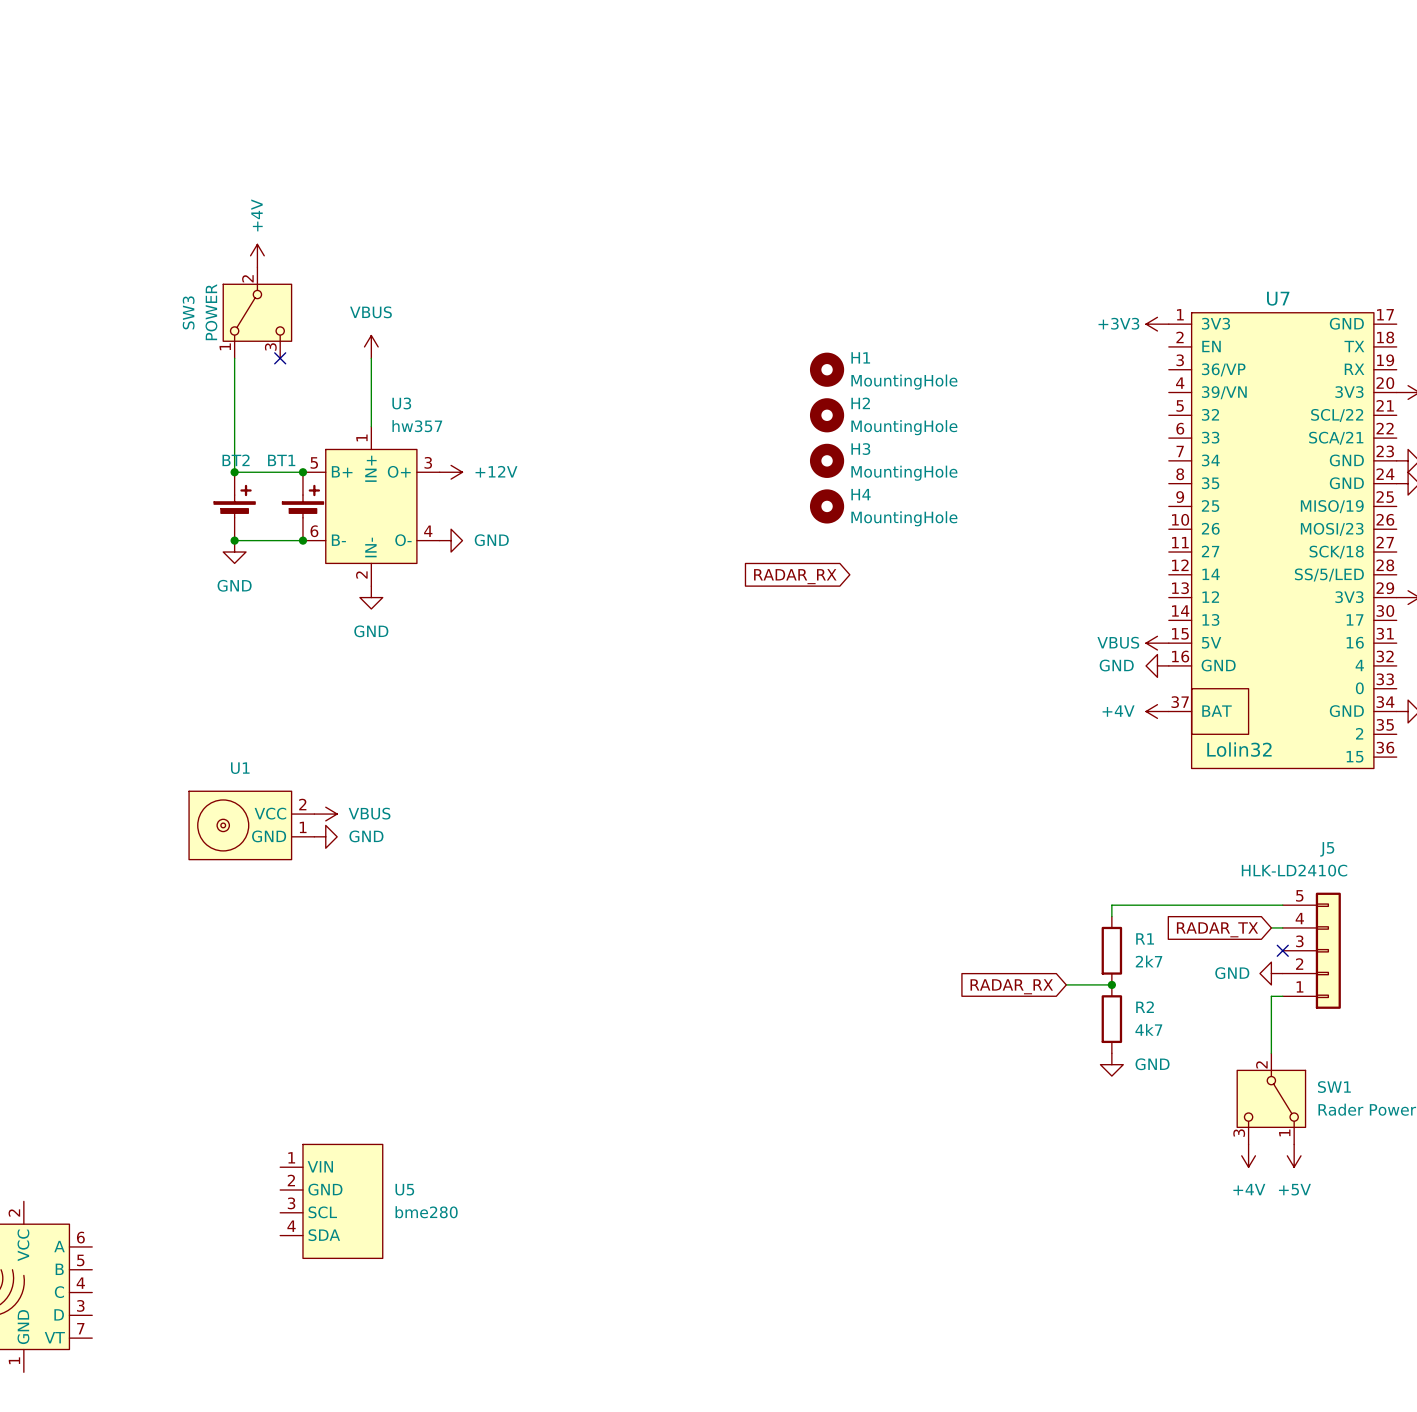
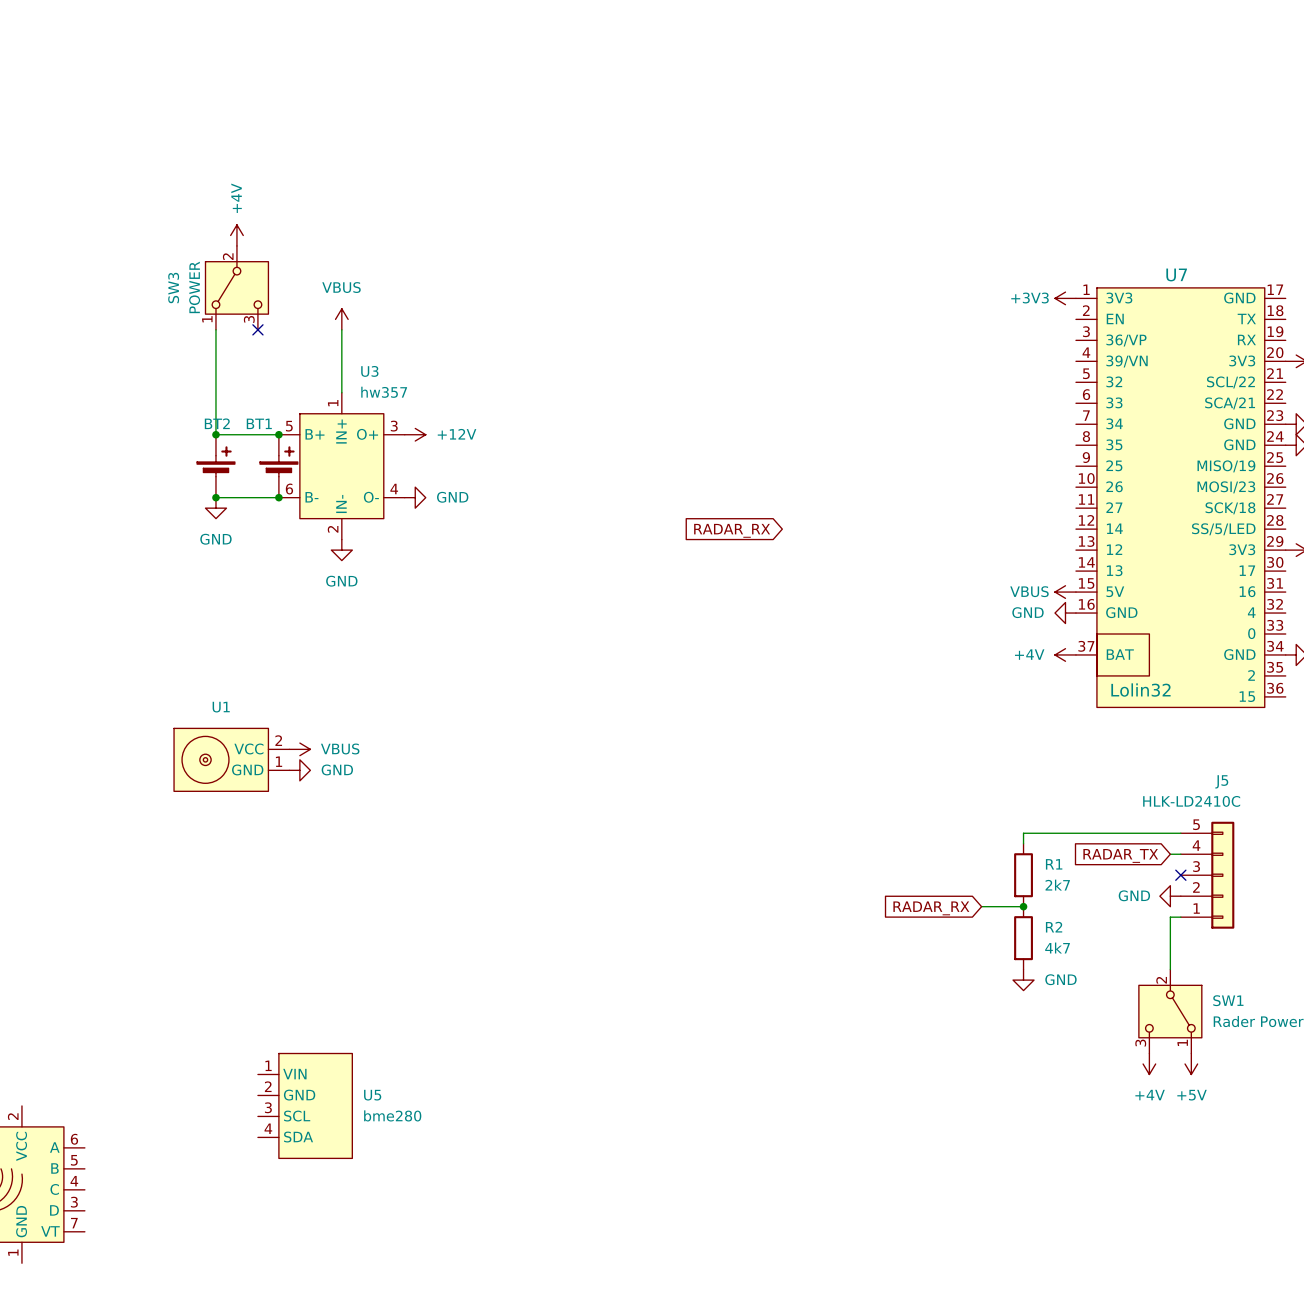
H1: MountingHole (827, 369) -> none
H2: MountingHole (827, 415) -> none
H3: MountingHole (827, 460) -> none
H4: MountingHole (827, 506) -> none

